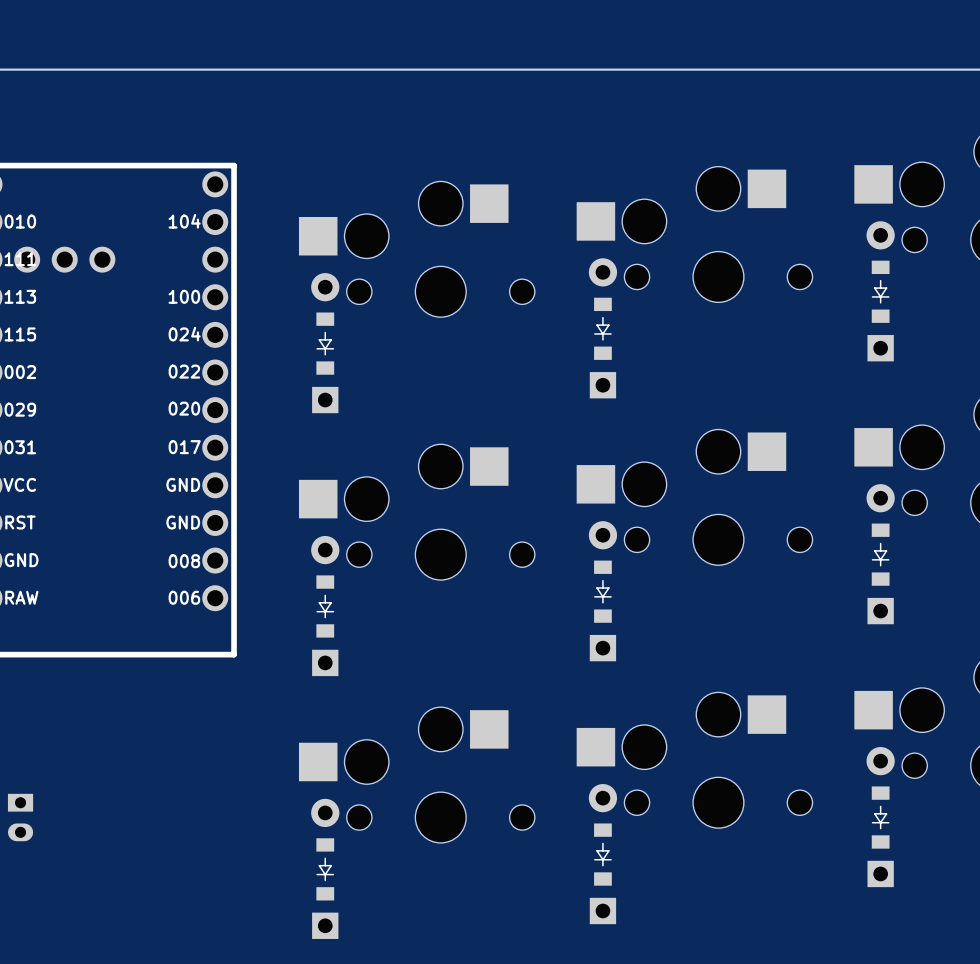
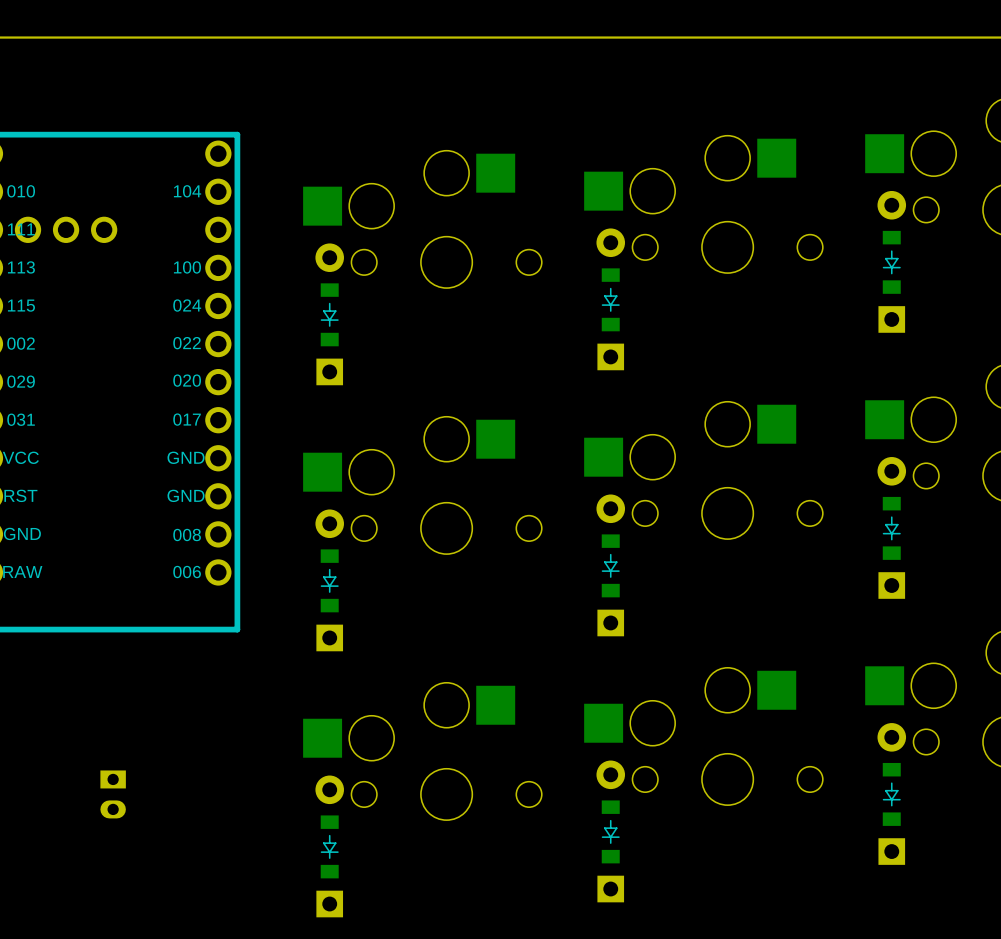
part position: (20, 817) -> (113, 794)

